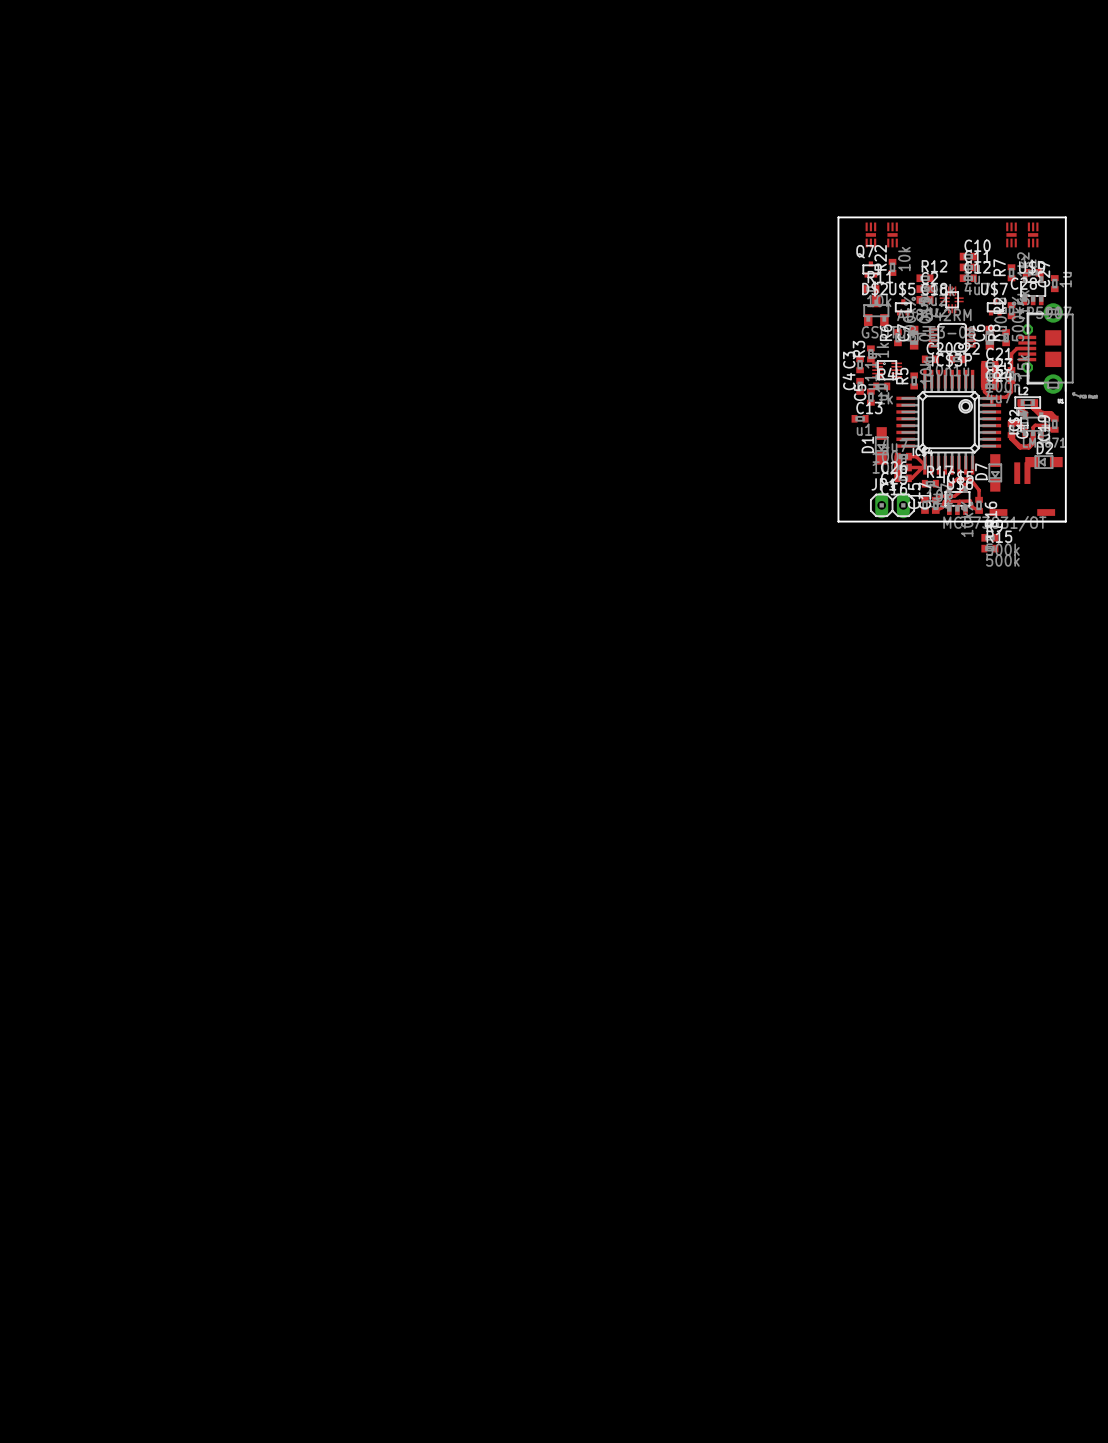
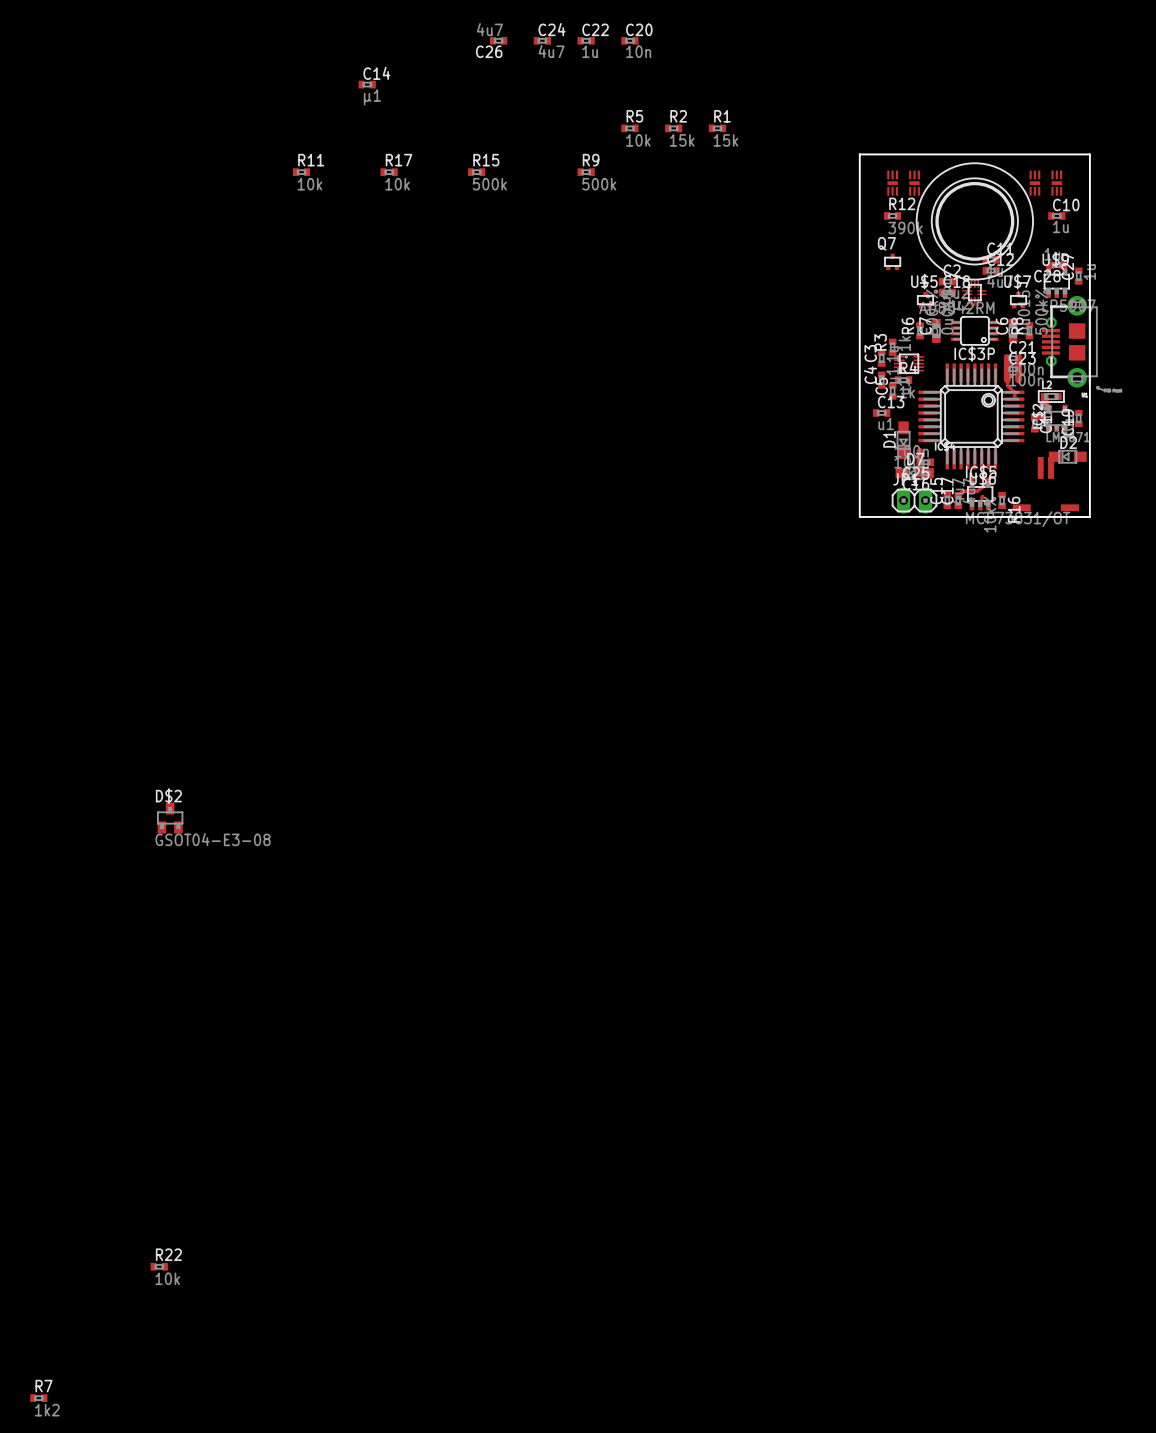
C14: none -> µ1 (367, 84)
part: none -> (892, 183)
part: none -> (914, 183)
part: none -> (1034, 183)
part: none -> (1056, 183)
board edge: (838, 217) (1065, 217) -> (859, 209) (859, 154) (1089, 154) (1089, 209)
part: none -> (974, 221)
part: (870, 234) -> none
part: (892, 234) -> none
part: (1011, 234) -> none
part: (1033, 234) -> none
C10 position: (968, 256) -> (1056, 215)
R22 rotation: 0° (892, 267) -> 90° clockwise (159, 1266)
R22 position: (892, 267) -> (159, 1266)
R7 rotation: 0° (1011, 272) -> 90° clockwise (38, 1398)
R7 position: (1011, 272) -> (38, 1398)
R12 position: (924, 278) -> (892, 215)
R11 position: (870, 289) -> (301, 172)
D$2 position: (876, 310) -> (170, 817)
R2 rotation: 0° (1011, 310) -> 90° clockwise (673, 128)
R2 position: (1011, 310) -> (673, 128)
track: (1027, 348) (1016, 348) (1011, 353) (1011, 370) -> none
C20 position: (930, 359) -> (629, 40)
C22 position: (957, 359) -> (586, 40)
R1 rotation: 0° (1011, 375) -> 90° clockwise (717, 128)
R1 position: (1011, 375) -> (717, 128)
R5 rotation: 0° (914, 380) -> 90° clockwise (629, 128)
R5 position: (914, 380) -> (629, 128)
track: (1011, 381) (1011, 391) (1006, 397) (991, 398) -> none
C24 position: (989, 386) -> (542, 40)
track: (1034, 402) (1034, 407) (1041, 414) (1050, 414) (1054, 418) -> none
track: (1054, 429) (1050, 429) (1046, 425) (1035, 425) (1033, 427) (1033, 442) (1028, 446) (1020, 446) (1011, 438) (1011, 435) -> none
C26 position: (903, 456) -> (498, 40)
track: (908, 456) (916, 456) (924, 465) (911, 478) (908, 478) -> none
track: (908, 467) (922, 467) -> none
D7 rotation: 0° (995, 472) -> 90° clockwise (914, 473)
D7 position: (995, 472) -> (914, 473)
R17 position: (930, 483) -> (389, 172)
track: (949, 487) (949, 489) (950, 484) (957, 478) (970, 478) (979, 490) (979, 499) -> none
track: (935, 509) (942, 507) (944, 501) (970, 501) (972, 507) (979, 510) -> none
R9 position: (989, 537) -> (586, 172)
R15 position: (989, 548) -> (476, 172)

